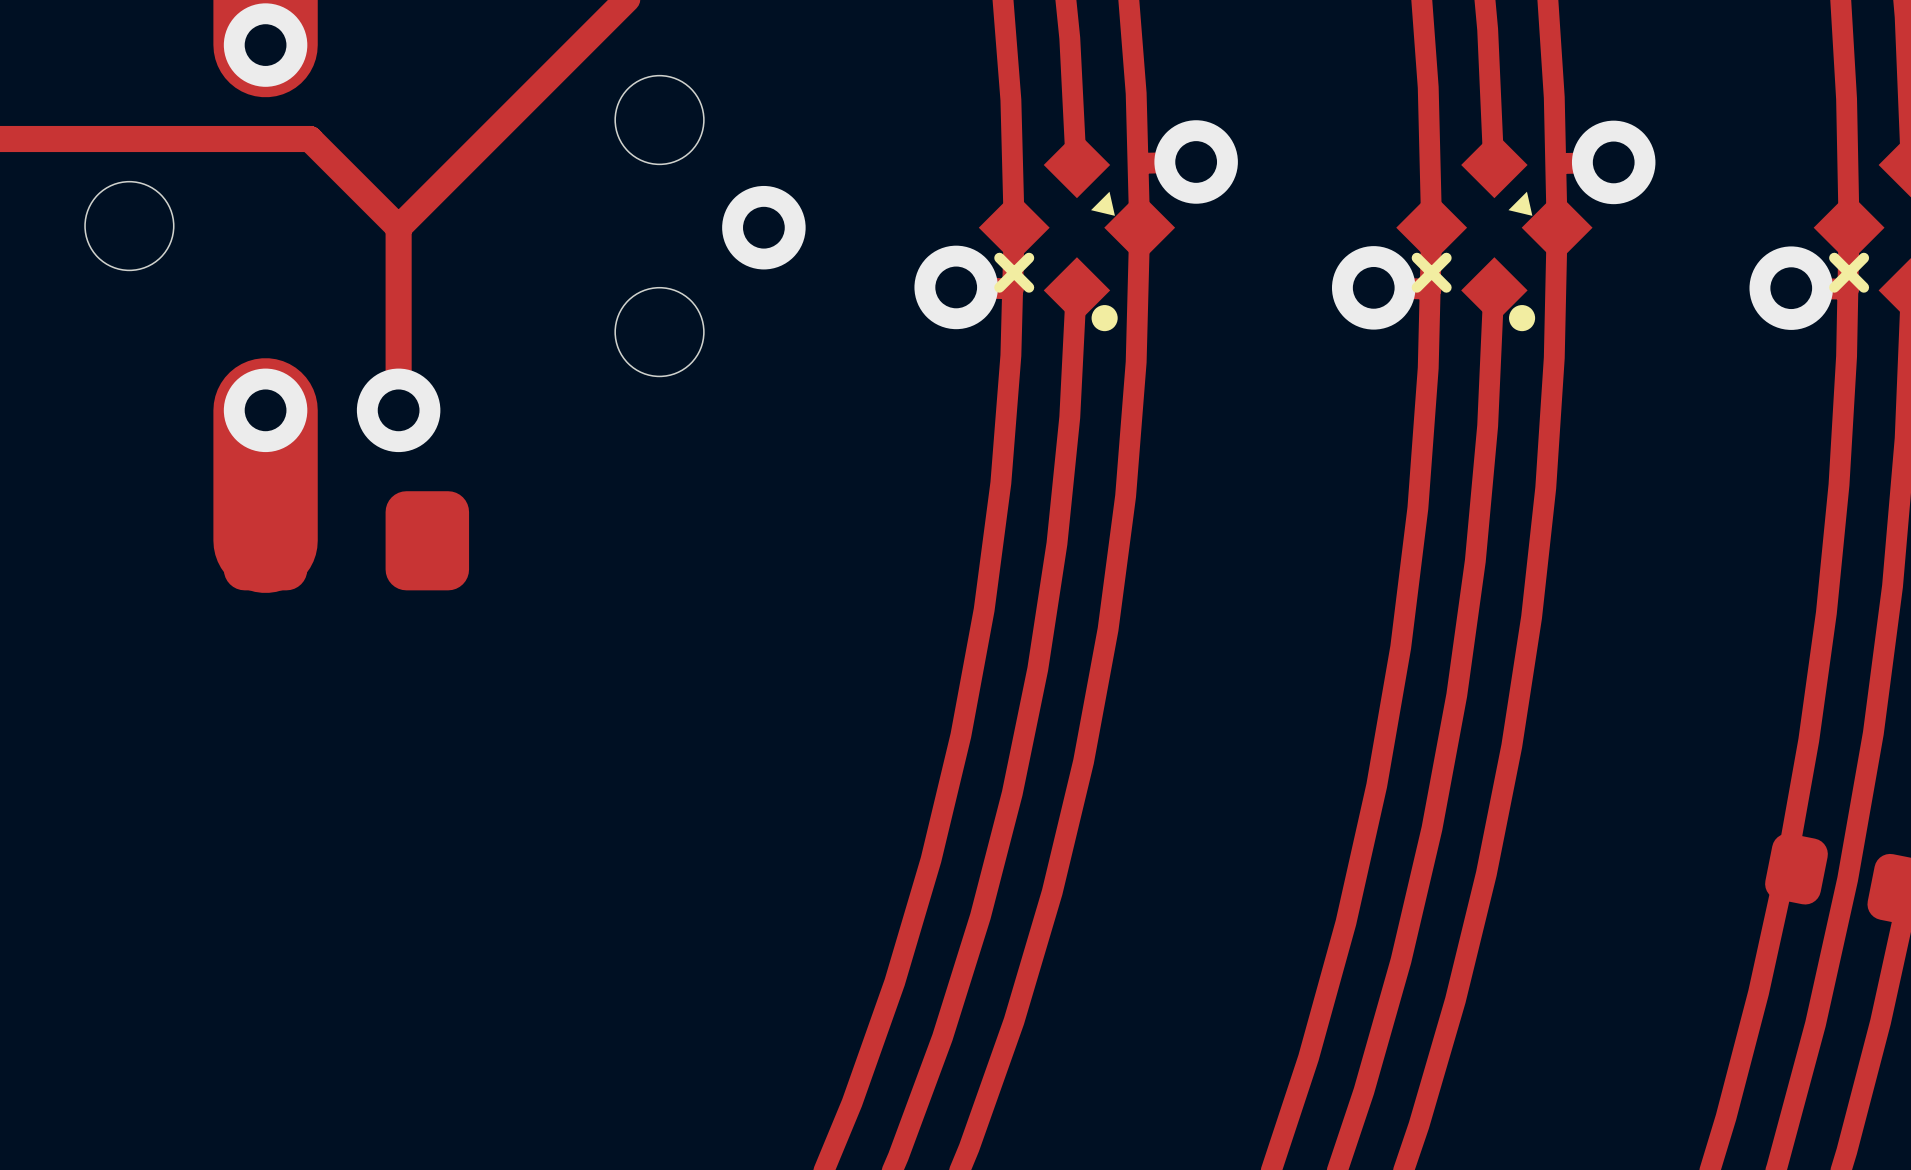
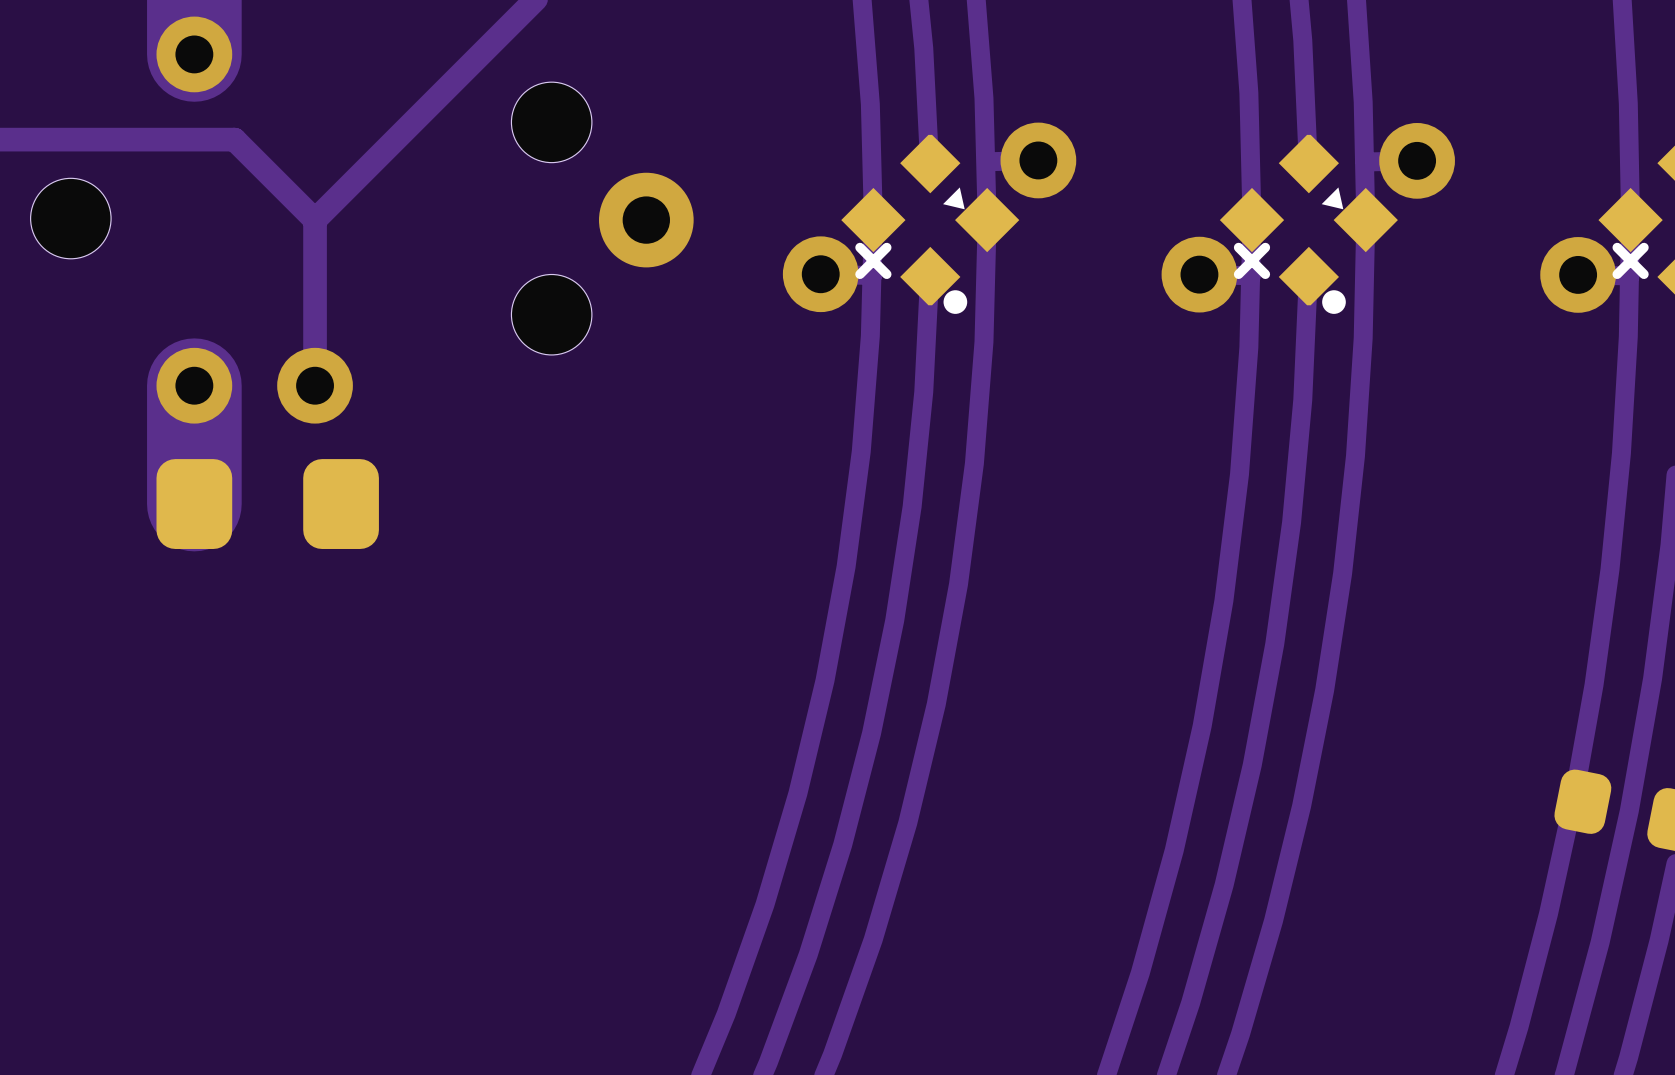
via size: [722, 185, 806, 270] -> [598, 172, 694, 268]

